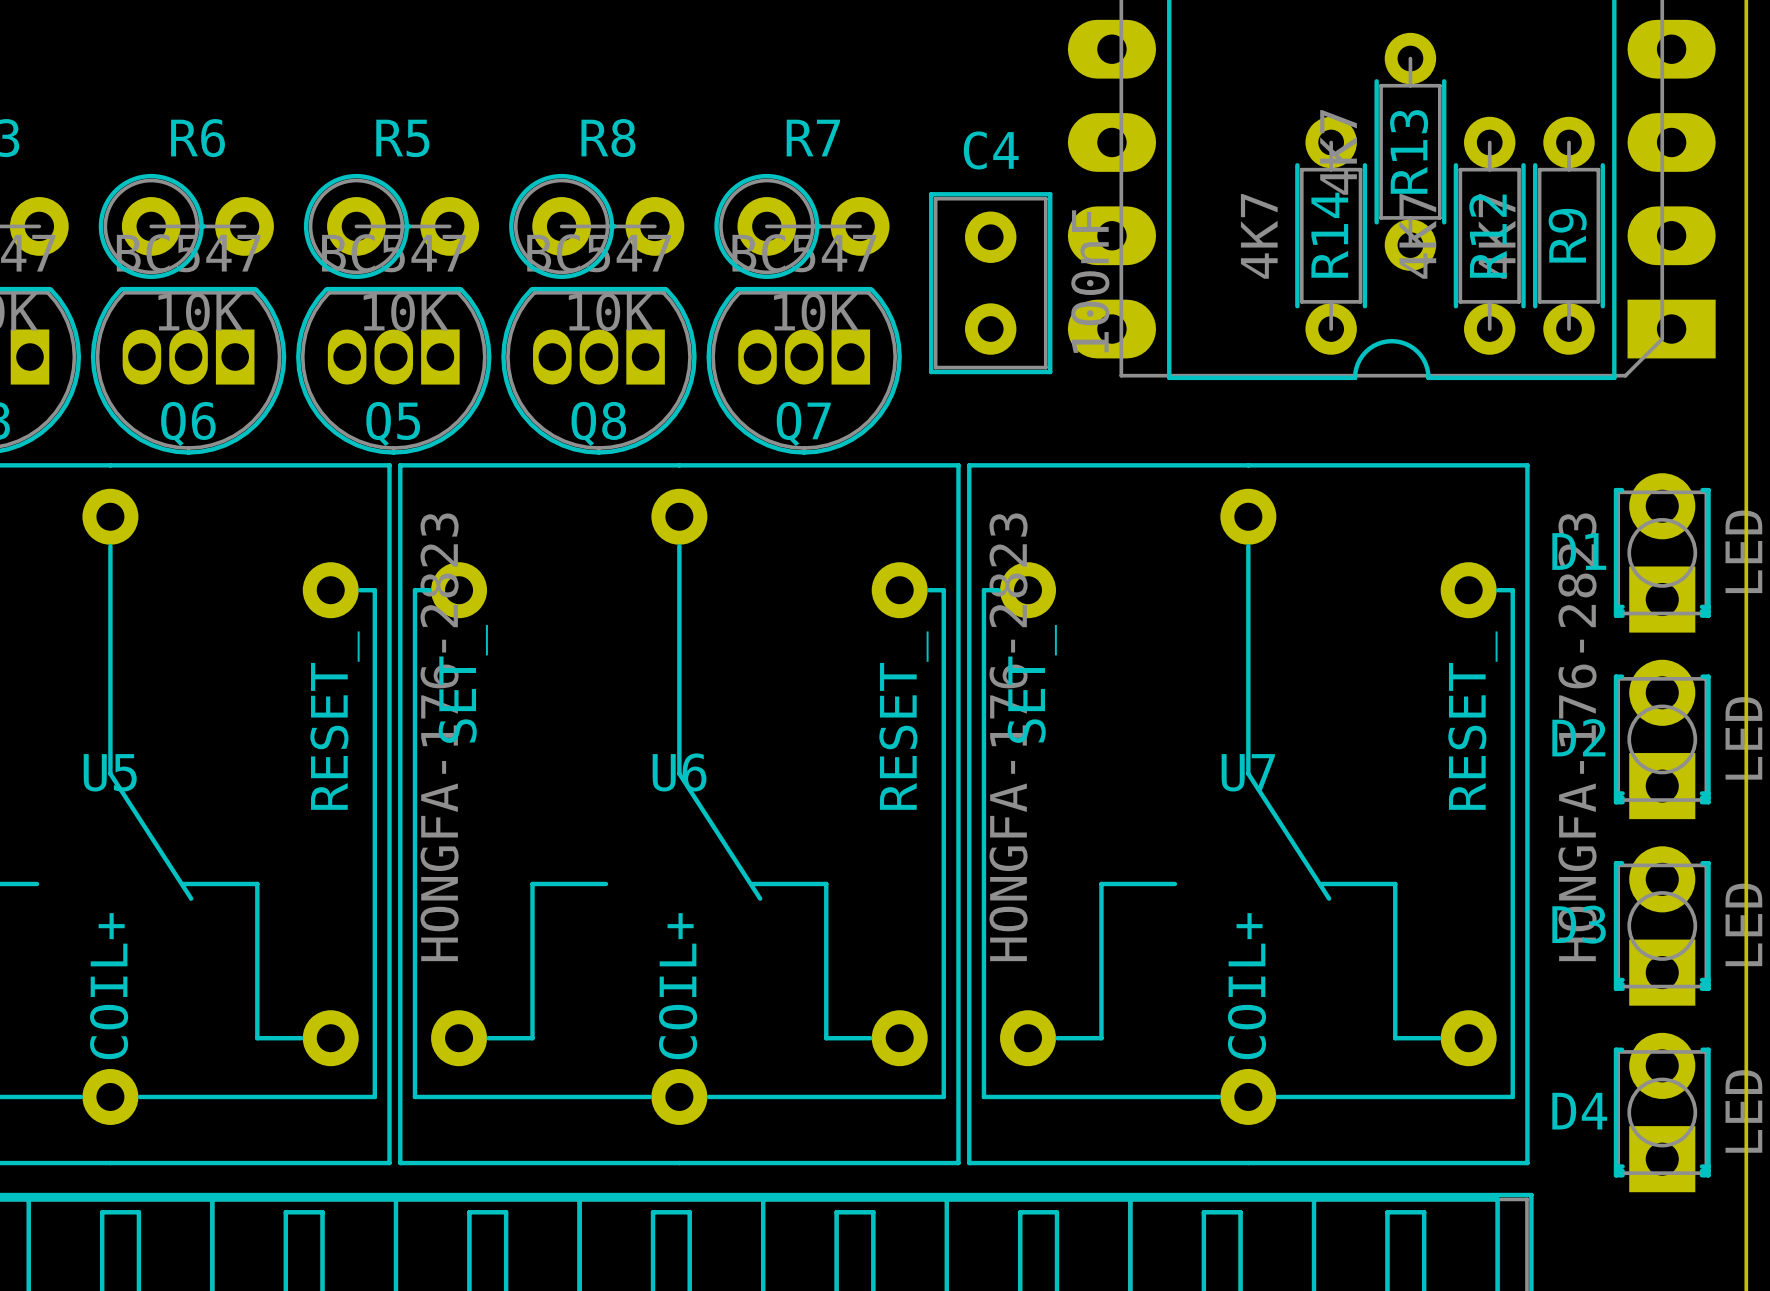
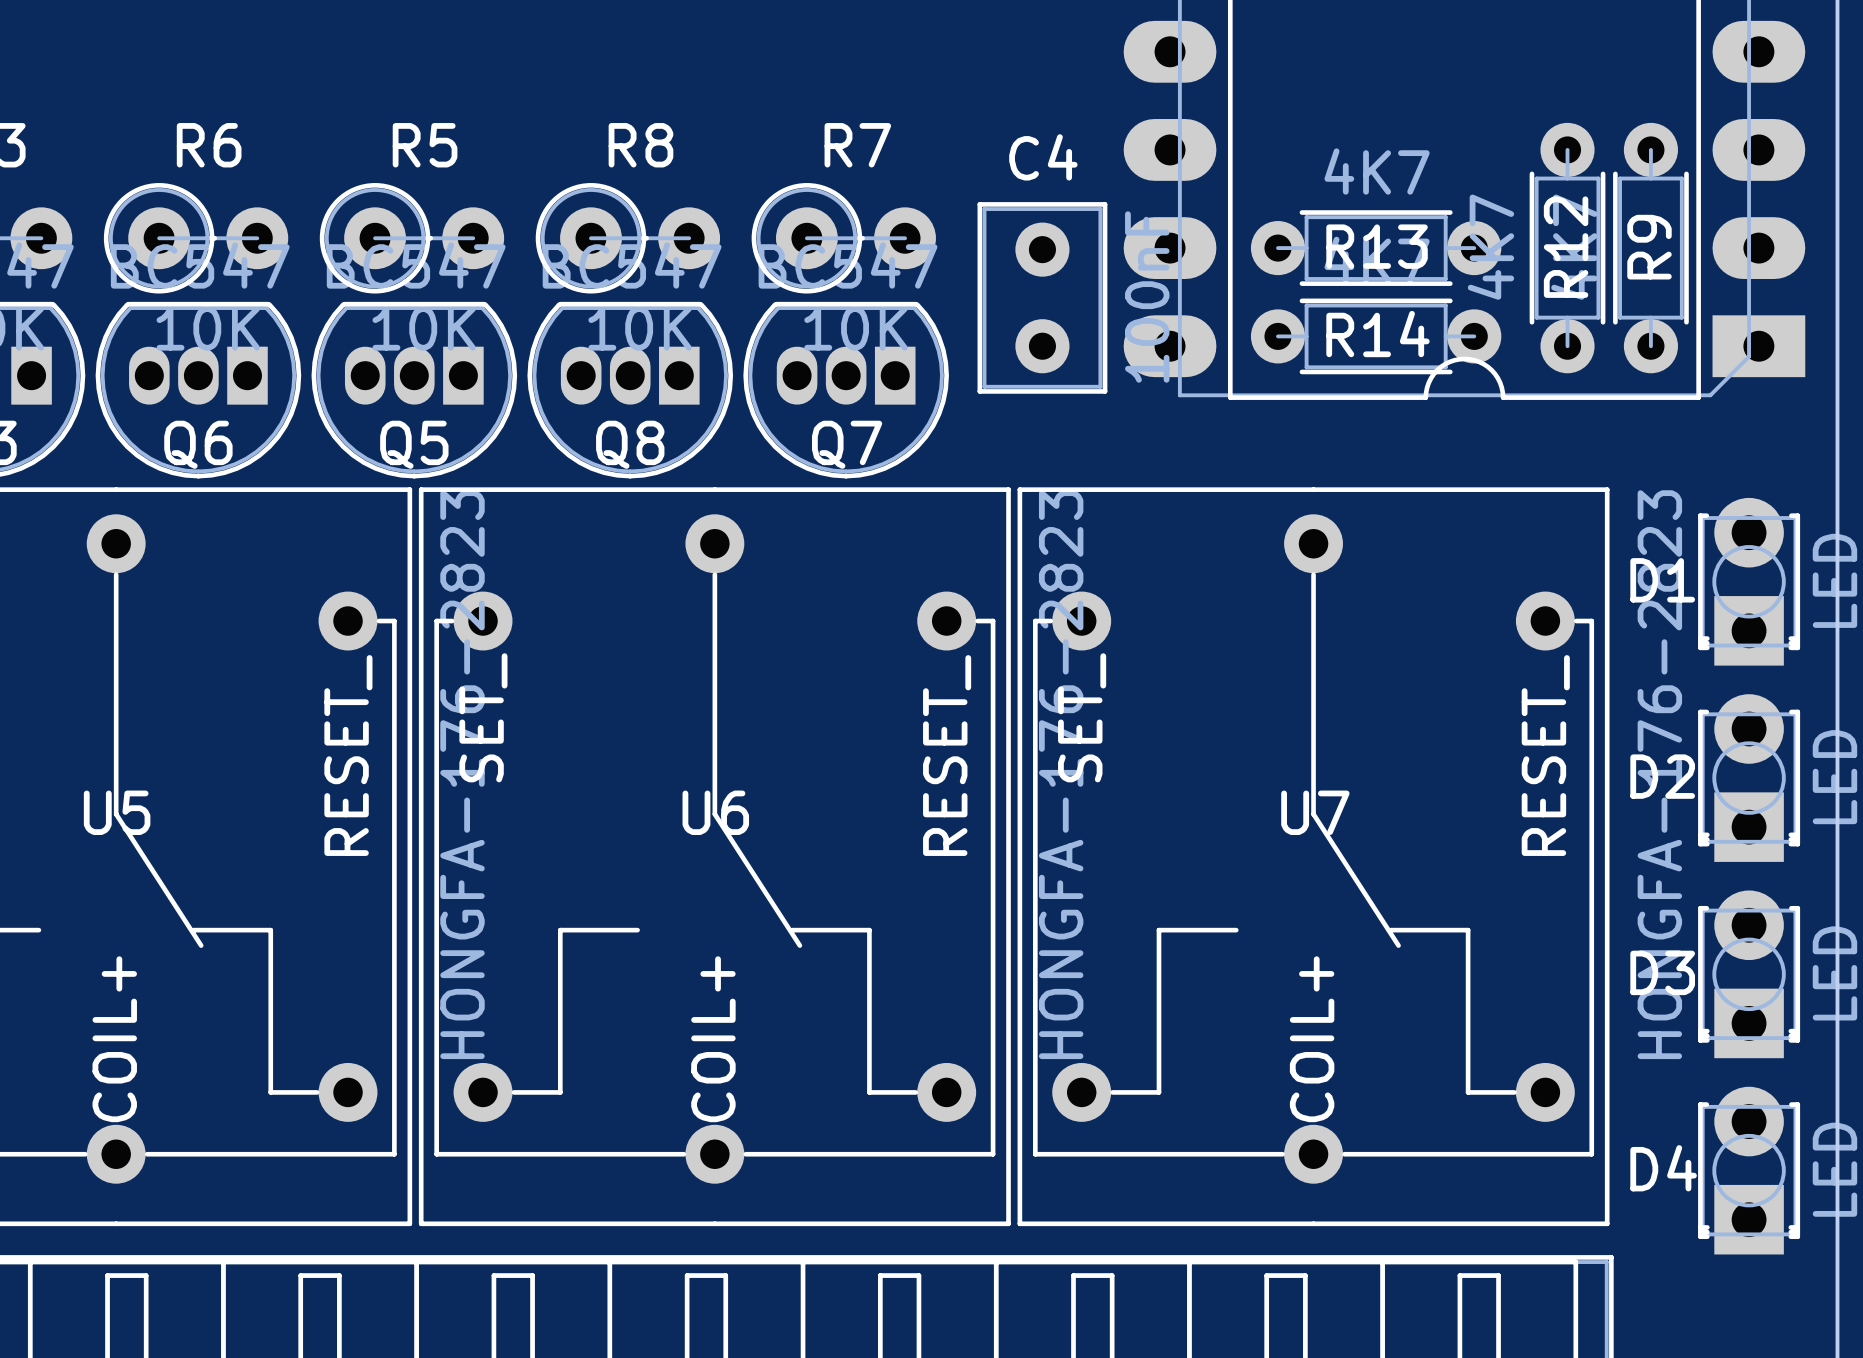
R13 rotation: 0° (1410, 151) -> 90° clockwise (1376, 248)
R14 rotation: 0° (1331, 235) -> 90° clockwise (1376, 336)

